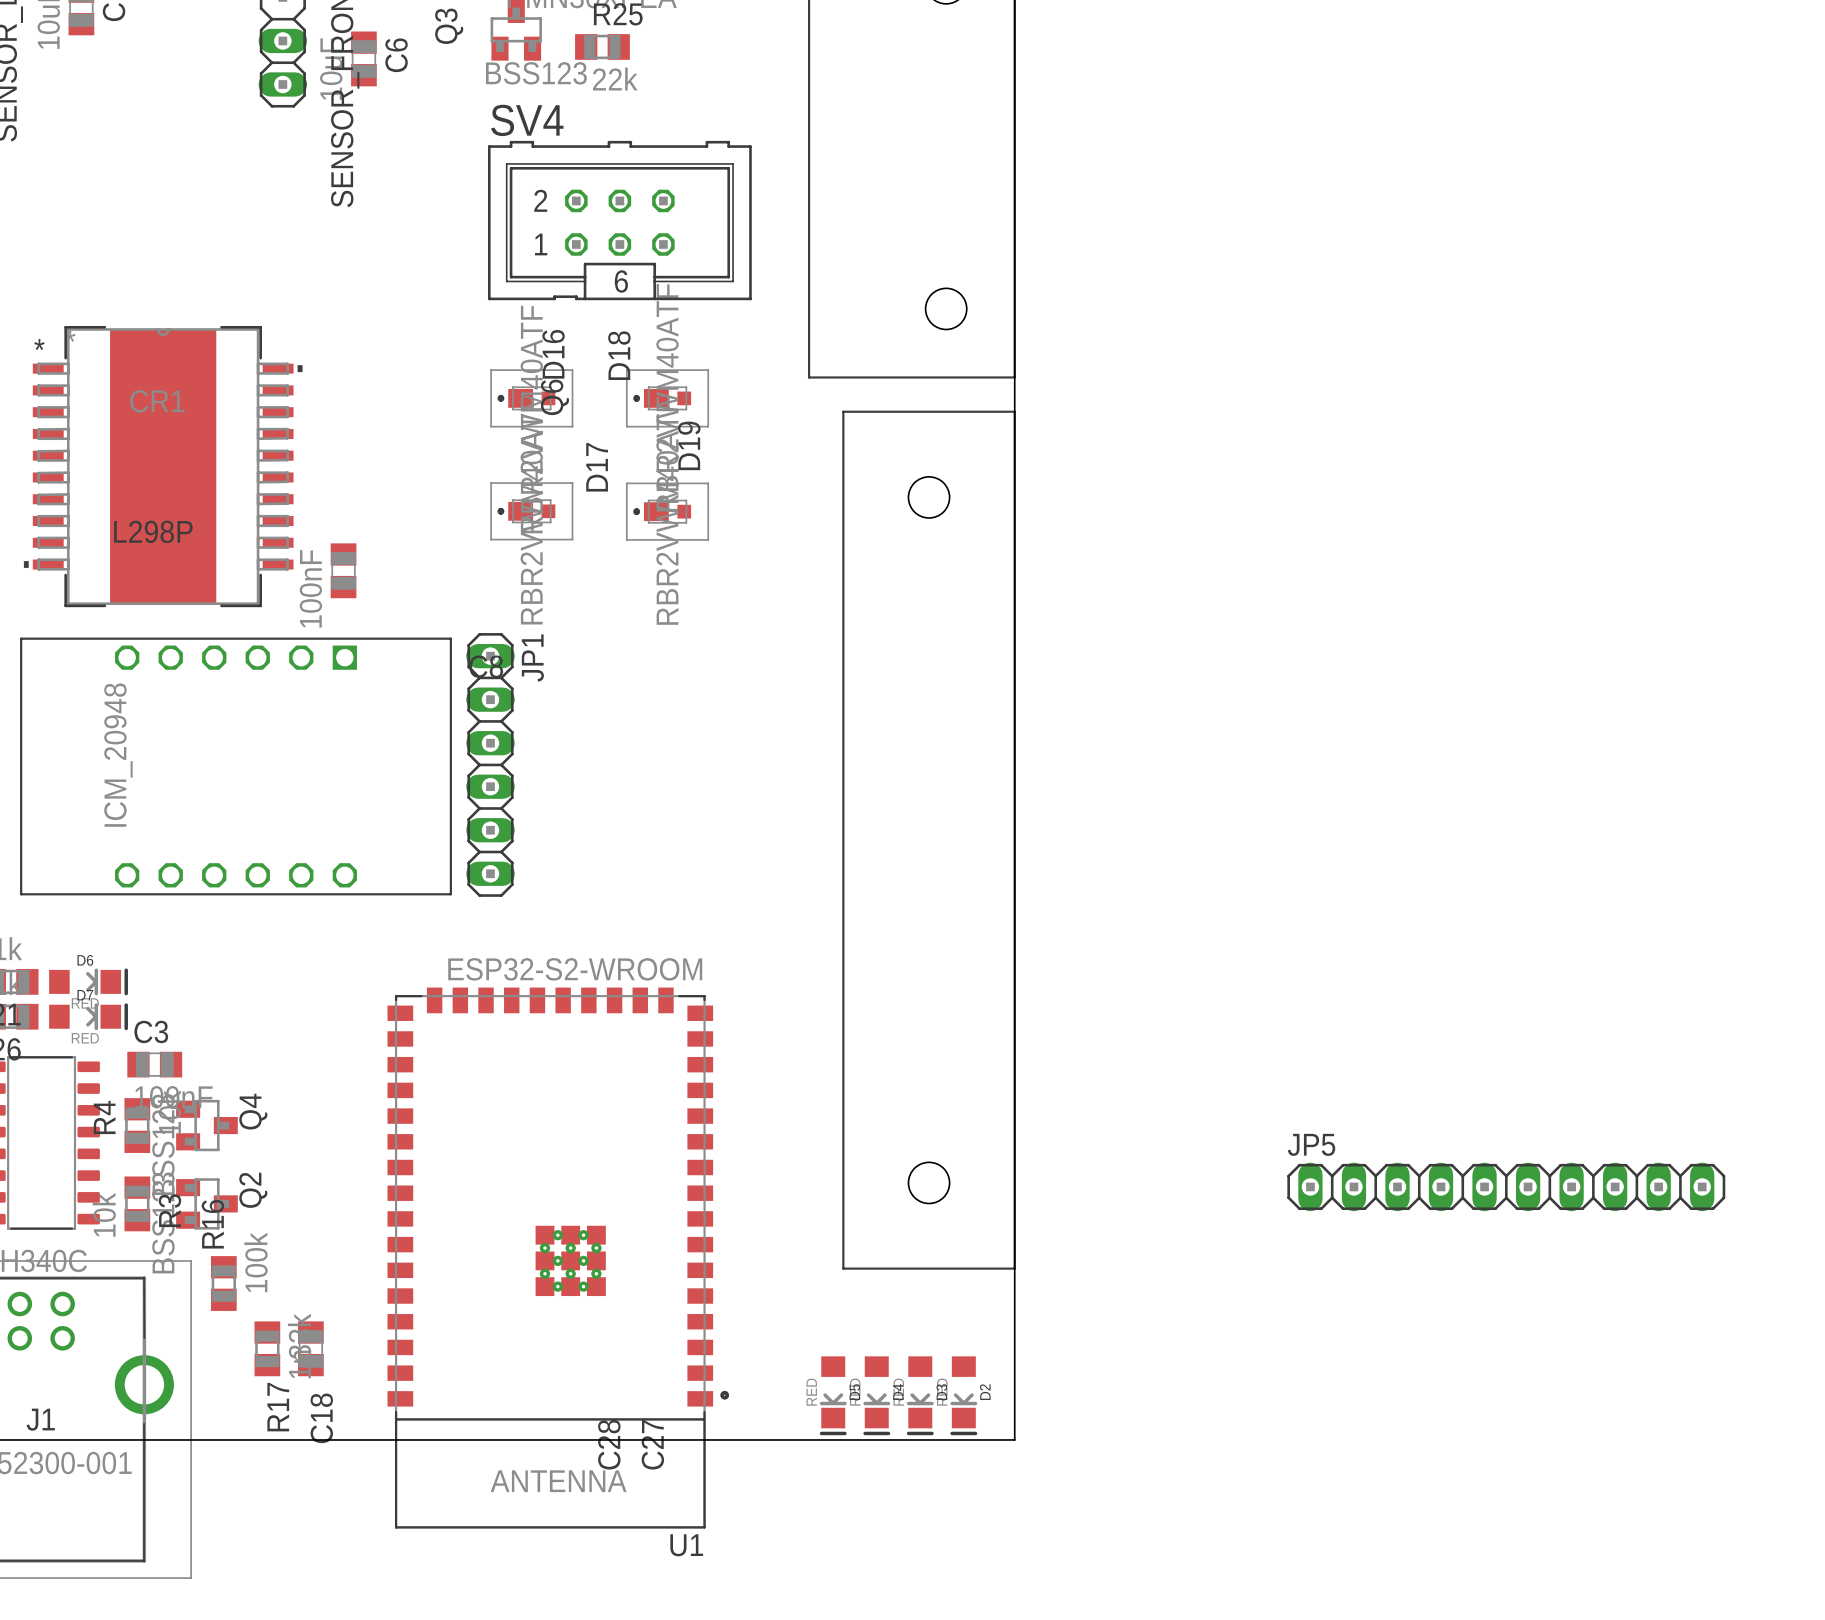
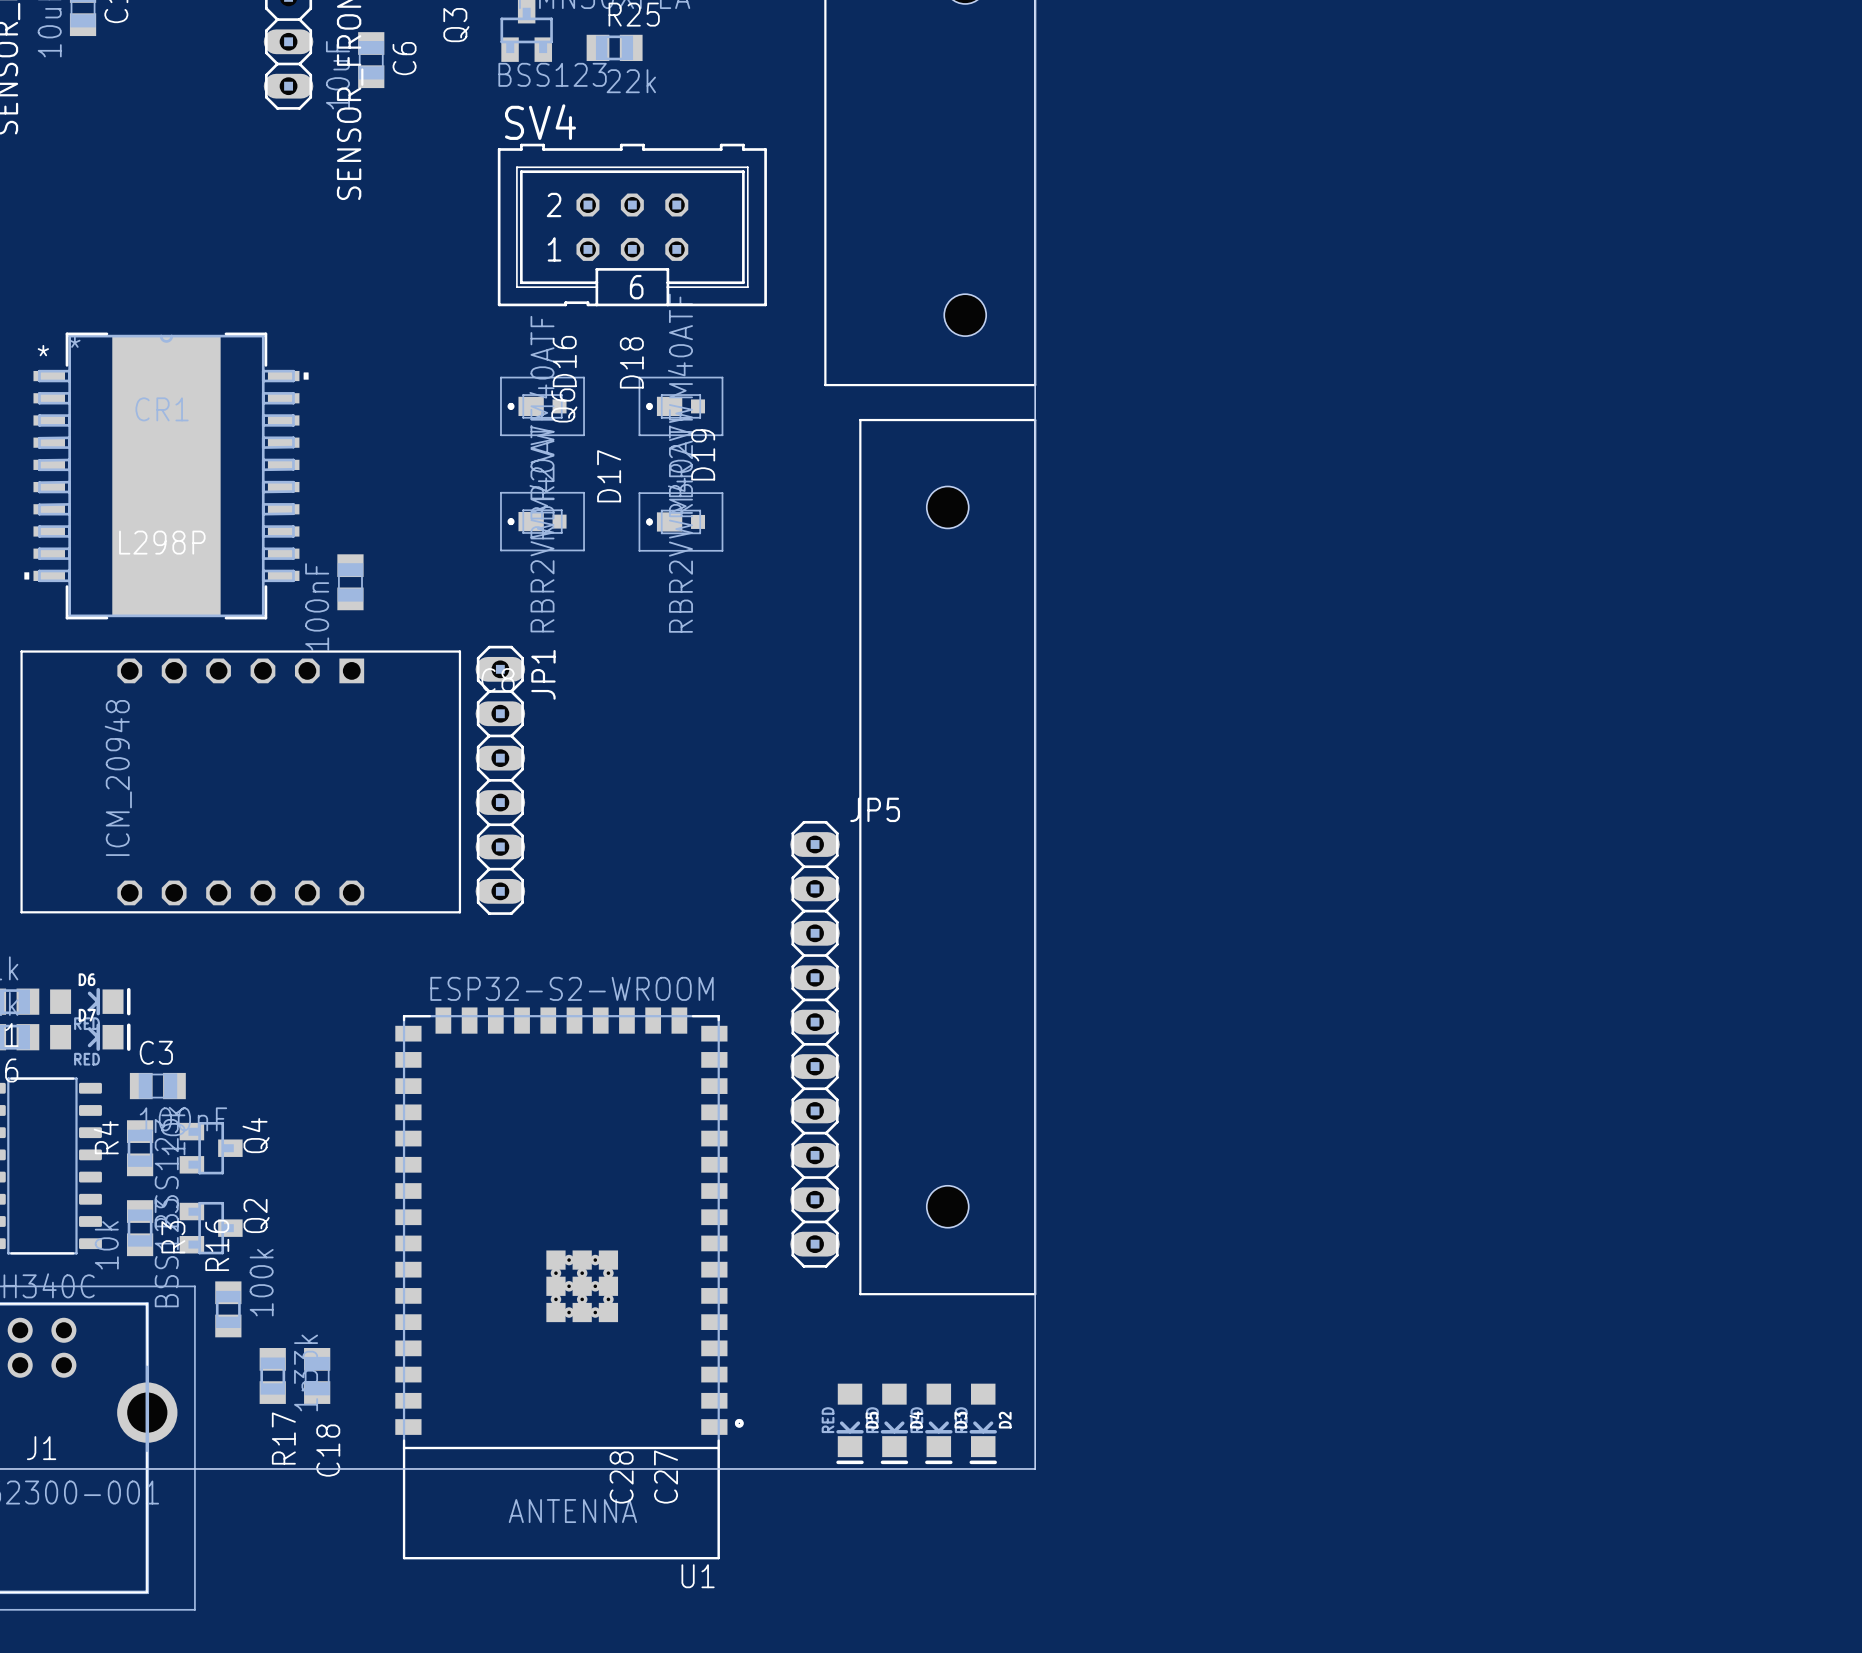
JP5 name position: JP5 (1311, 1144) -> JP5 (875, 809)
JP5 rotation: 0° (1506, 1186) -> 90° clockwise (815, 1044)
JP5 position: (1506, 1186) -> (815, 1044)

